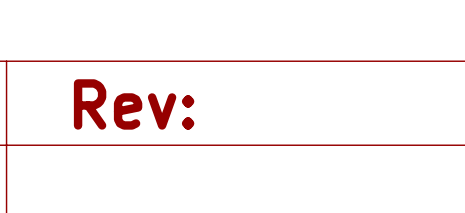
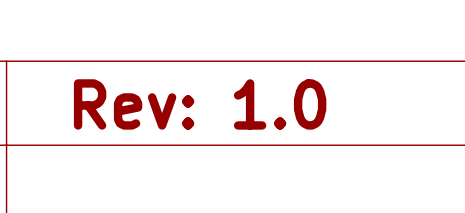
title block: Rev: (134, 104) -> Rev: 1.0 (200, 104)

